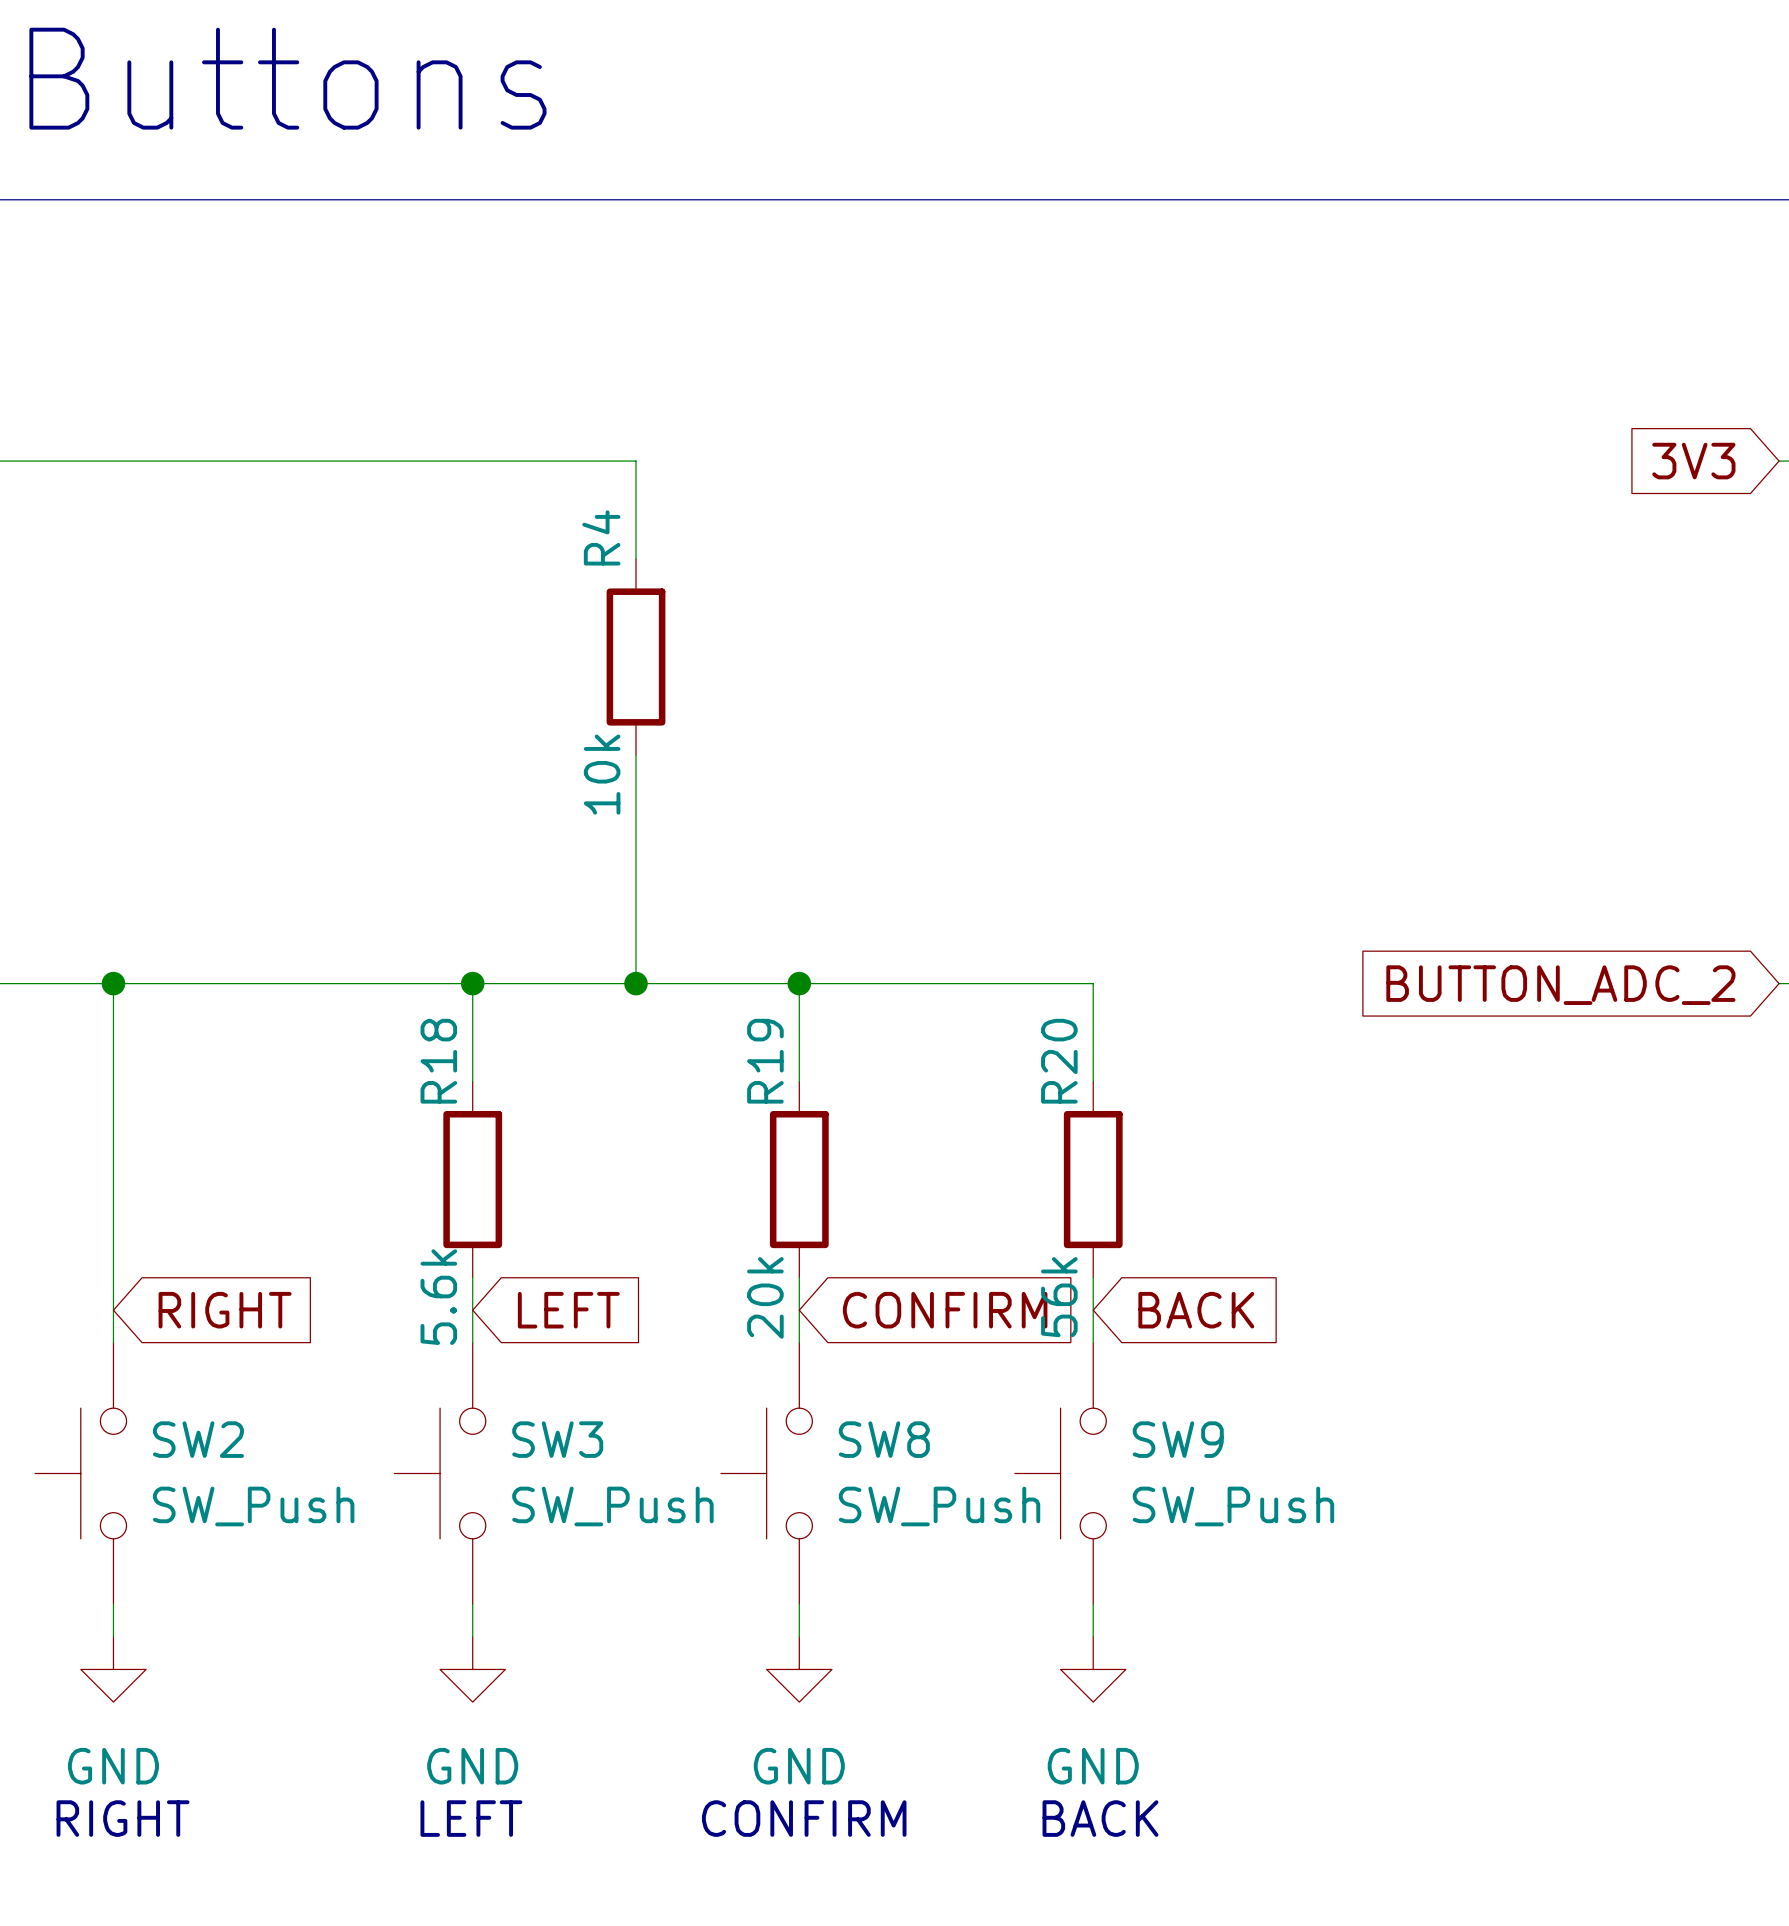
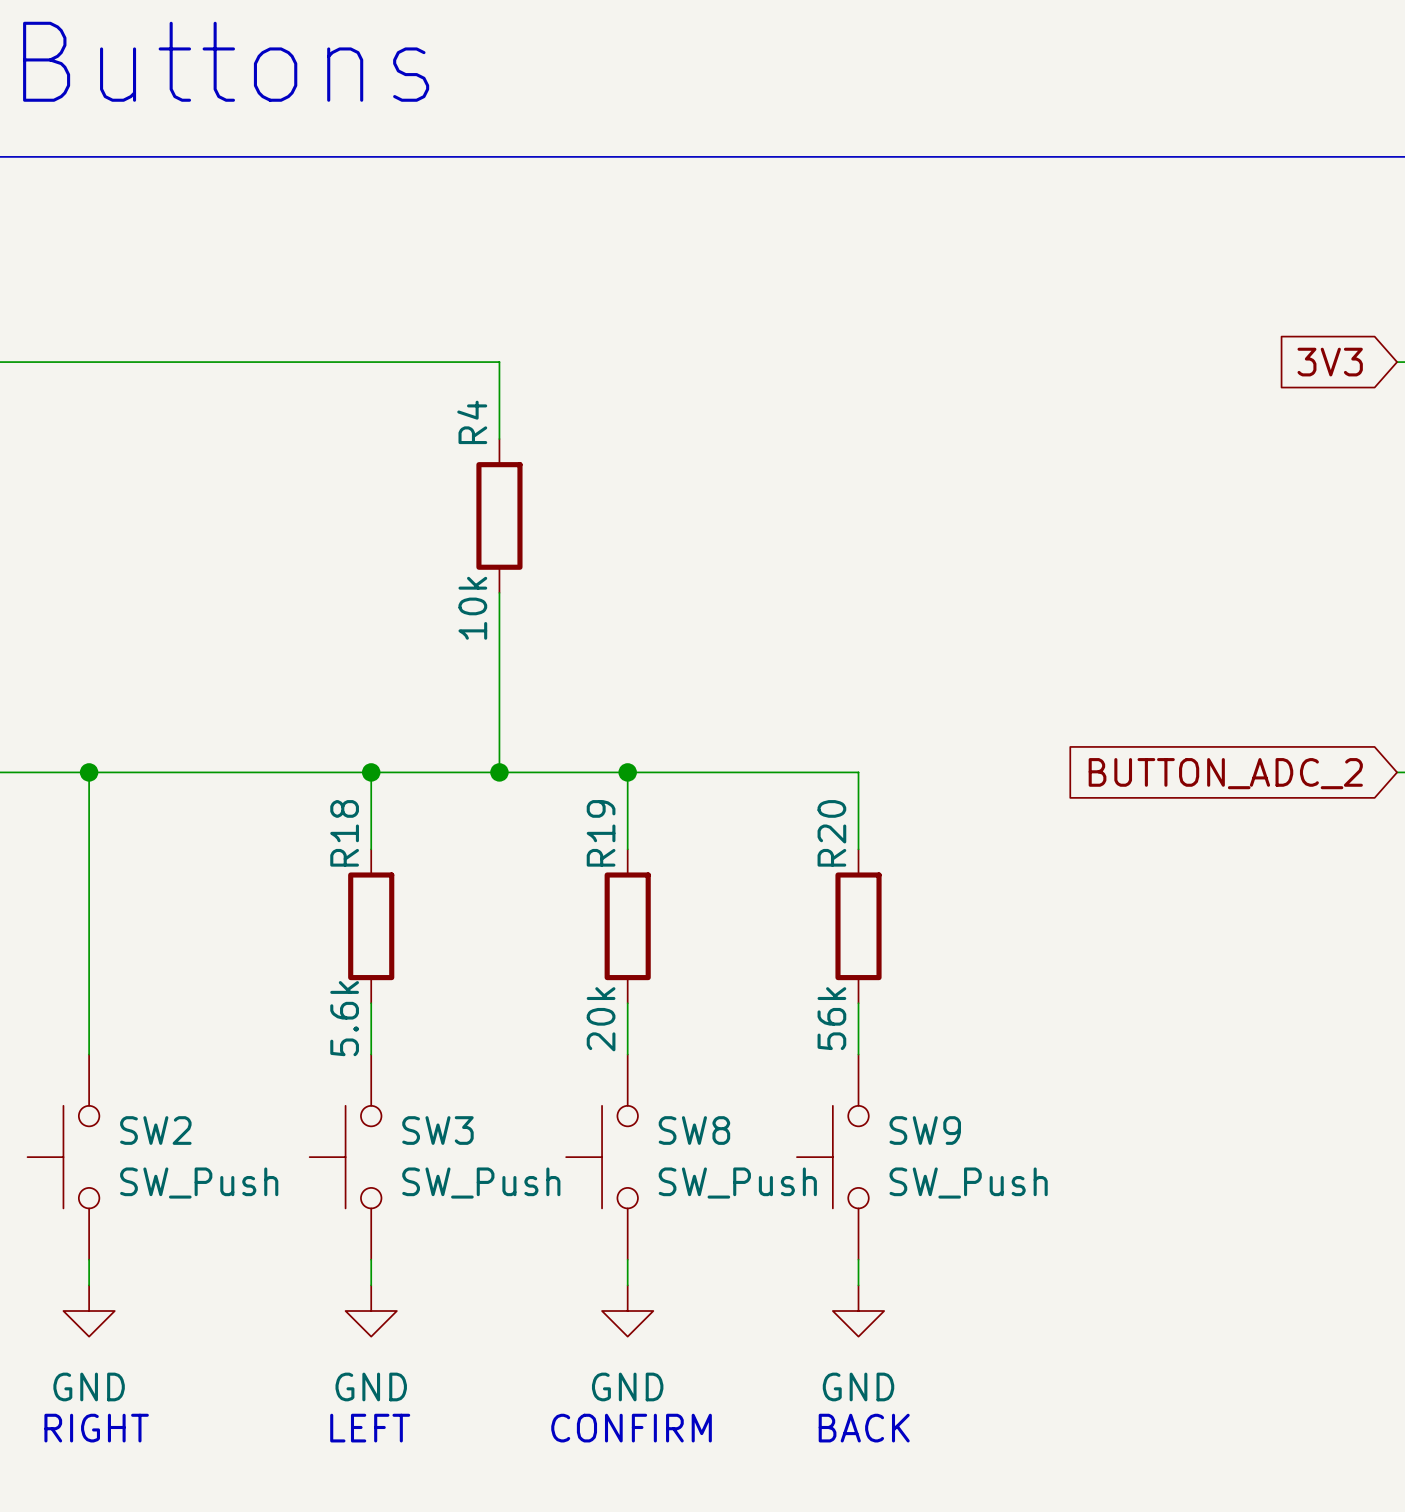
global label: RIGHT (225, 1310) -> none
global label: LEFT (568, 1310) -> none
global label: CONFIRM (945, 1310) -> none
global label: BACK (1196, 1310) -> none

